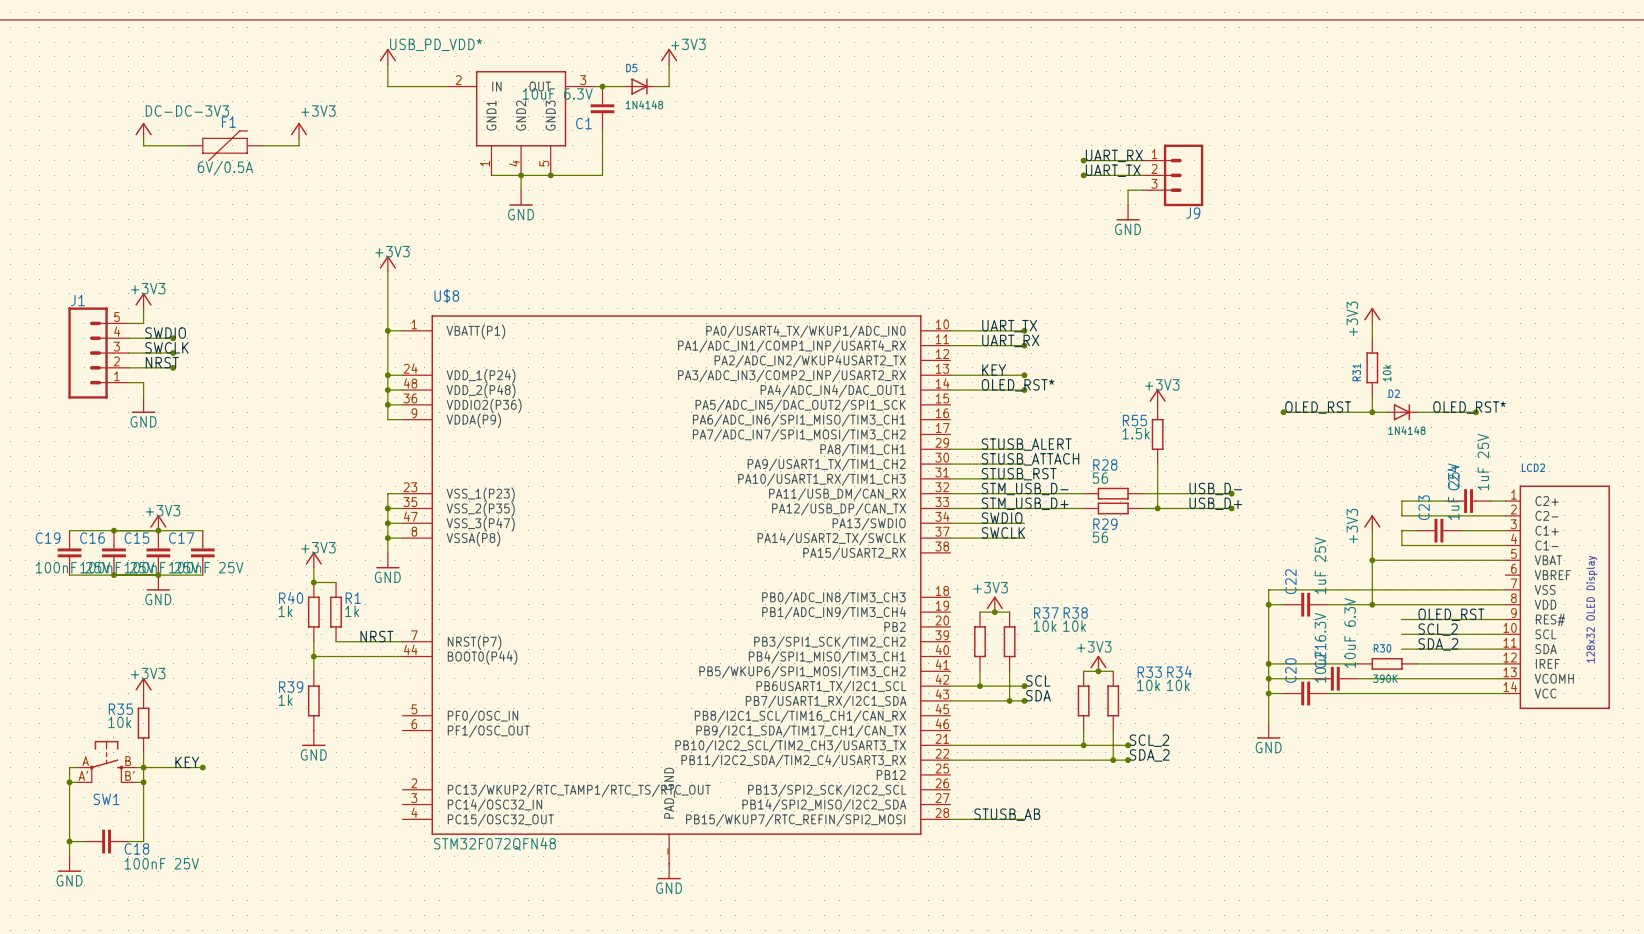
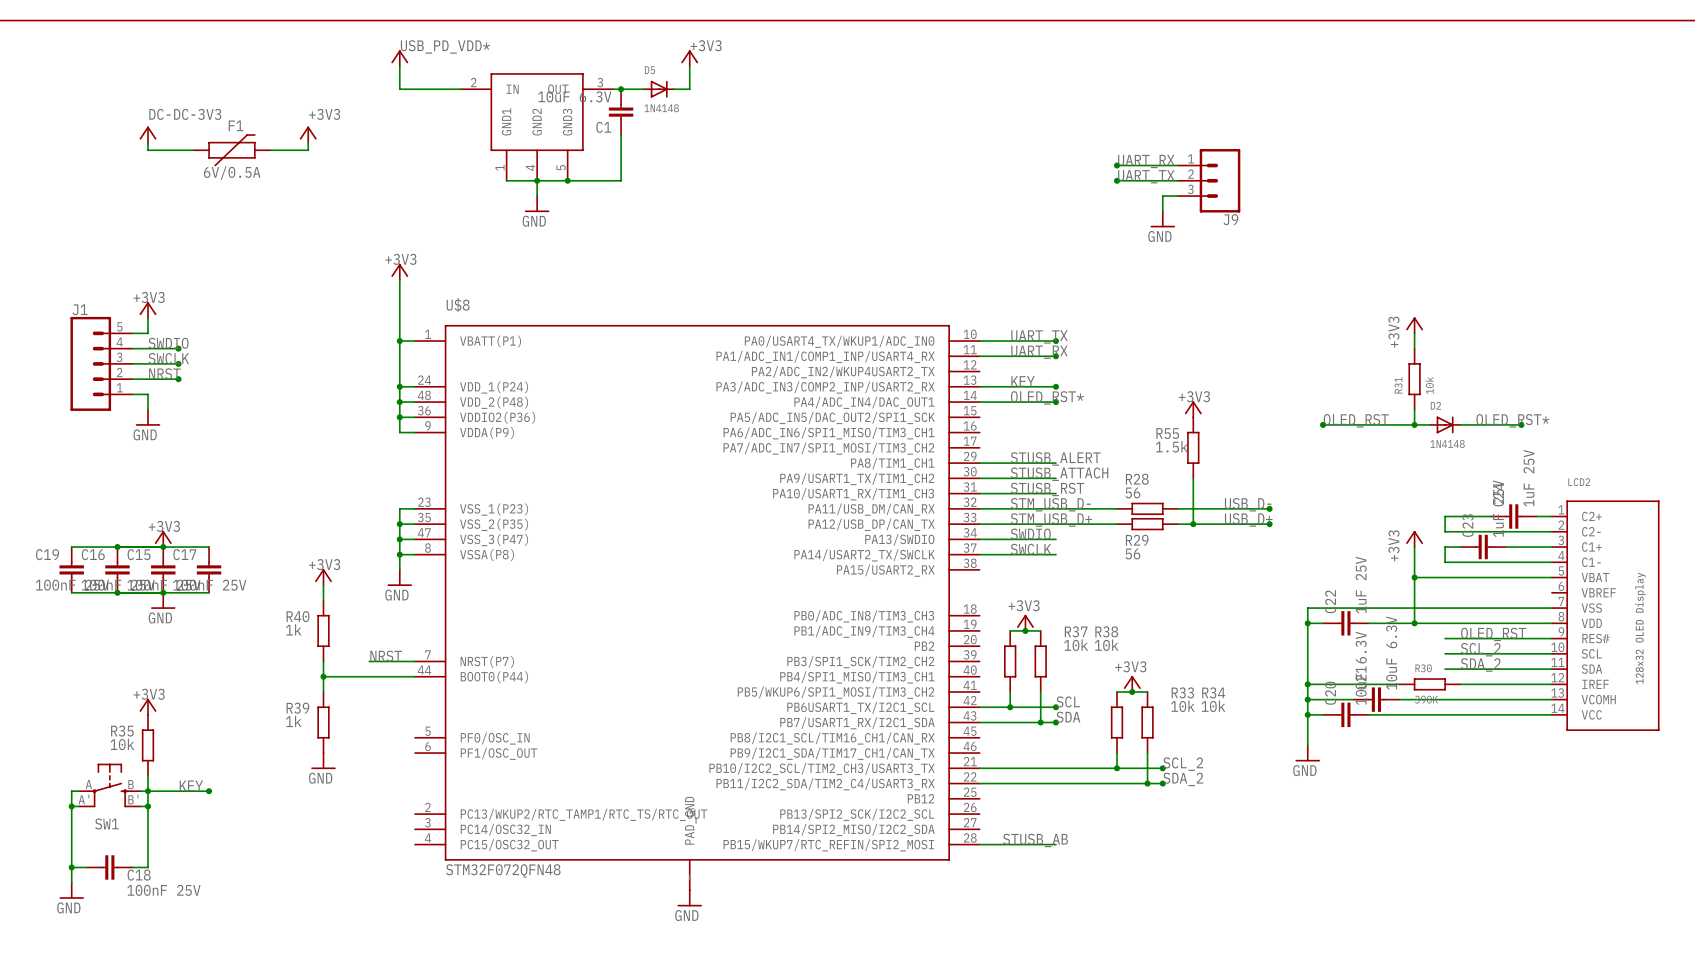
wire: (313, 582) (336, 582) -> none
junction: (313, 582) -> none
R1: 1k (336, 612) -> none
wire: (336, 641) (358, 641) -> none

